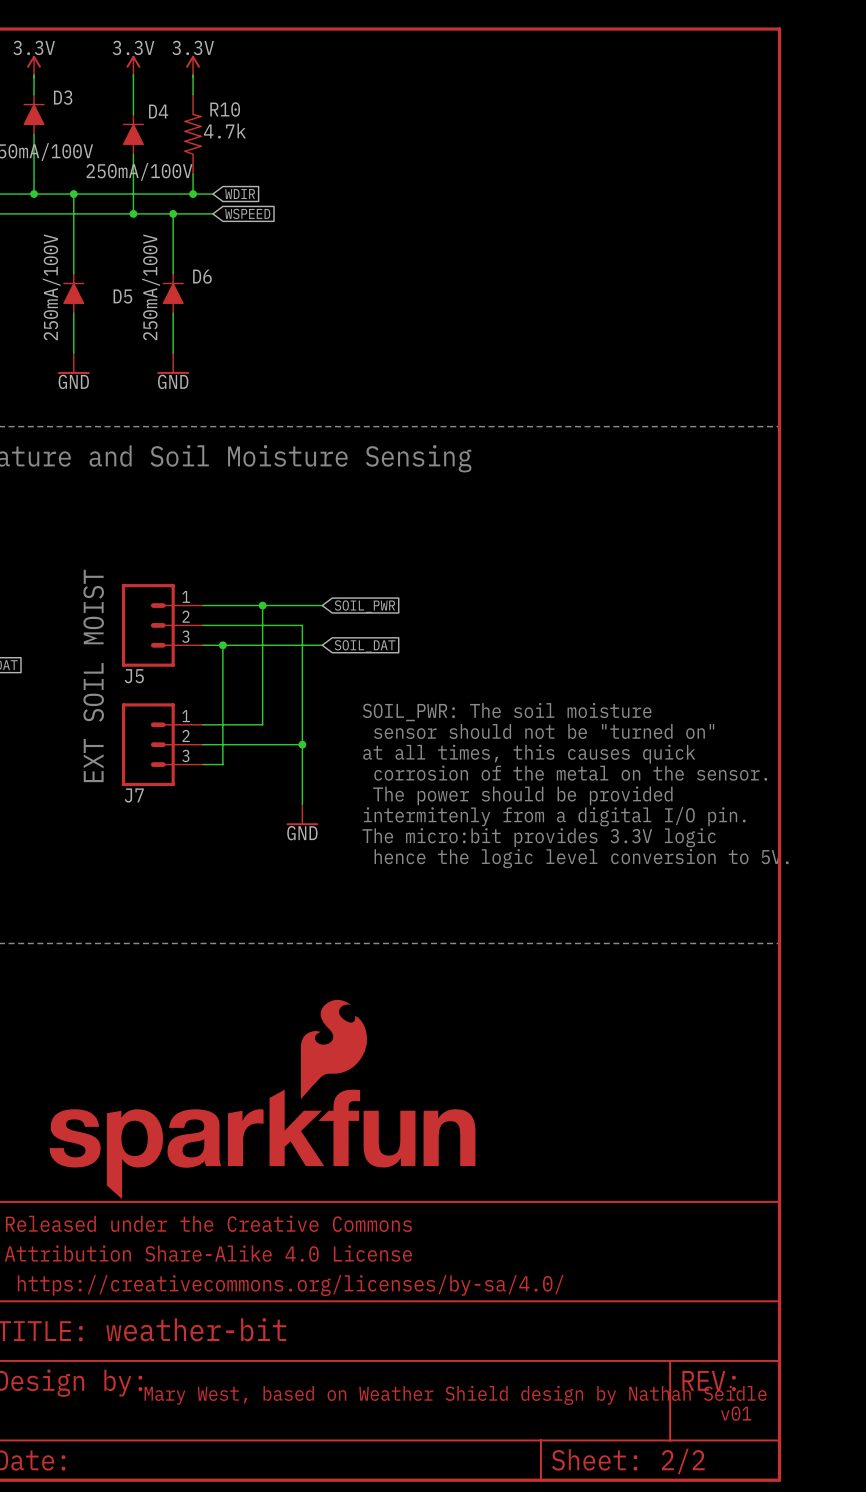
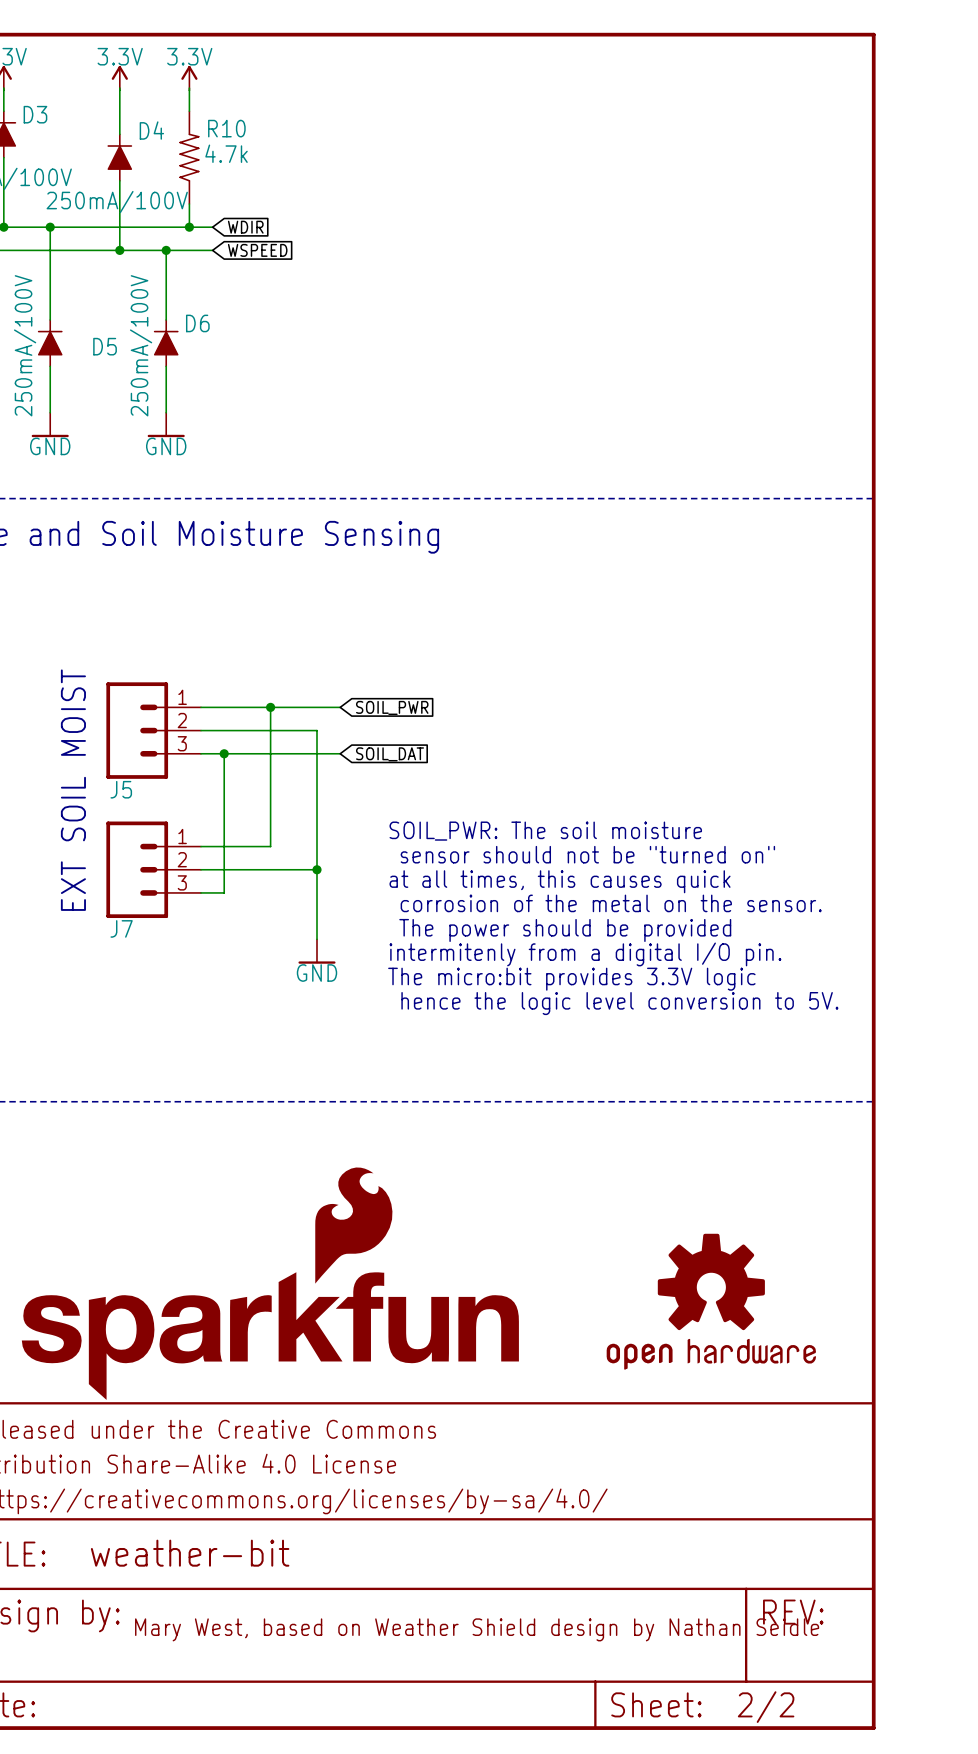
part: none -> (711, 1301)
text: v01 (736, 1413) -> none

